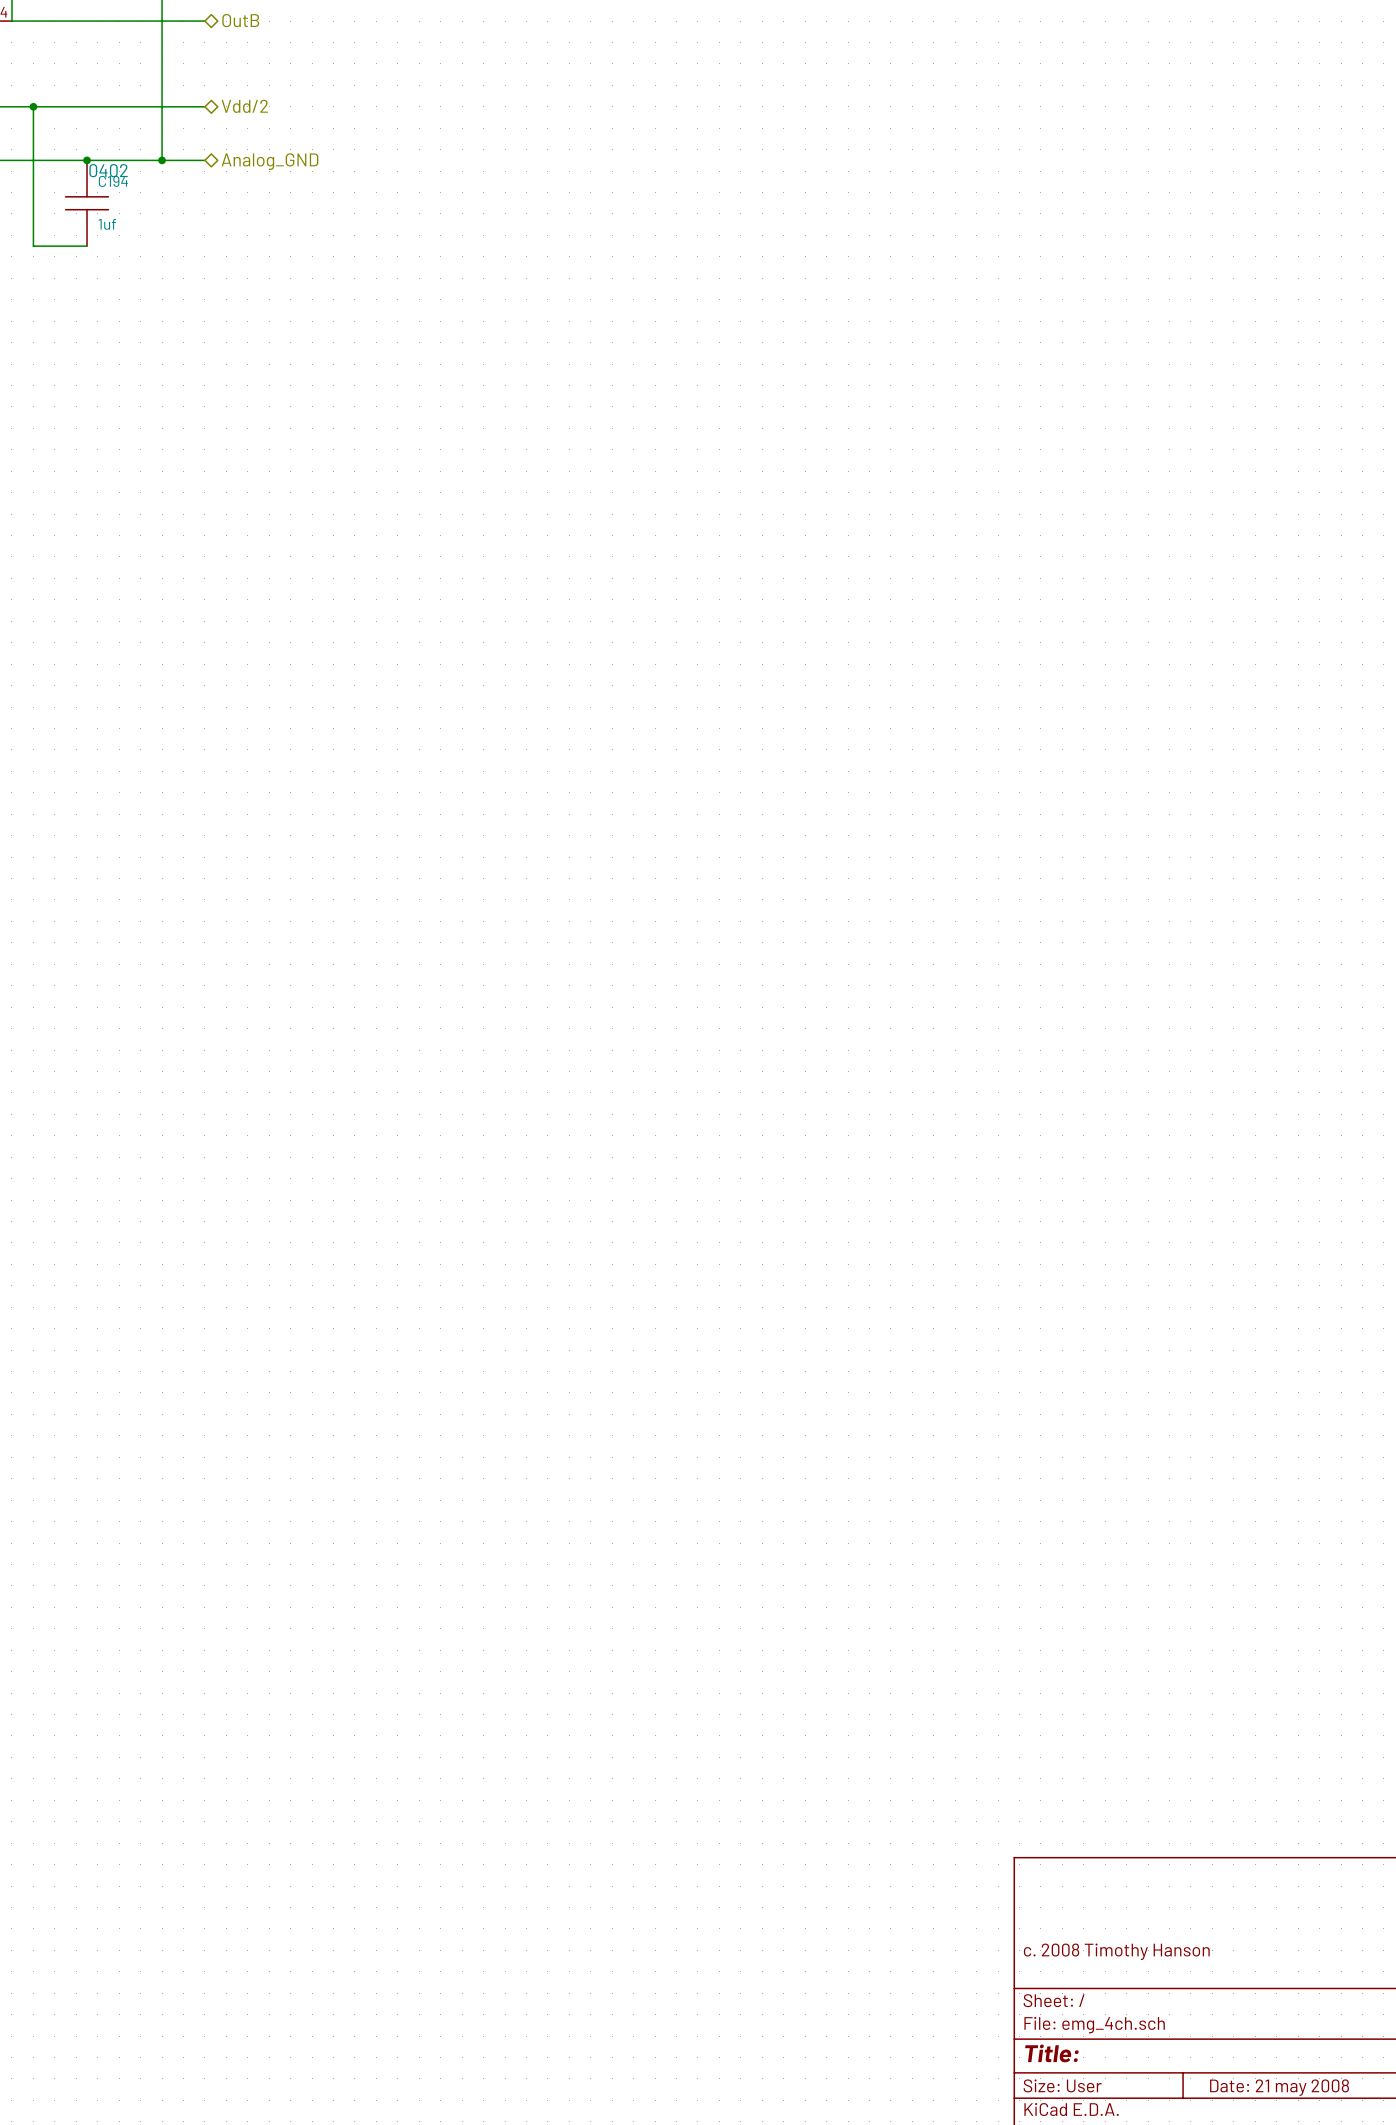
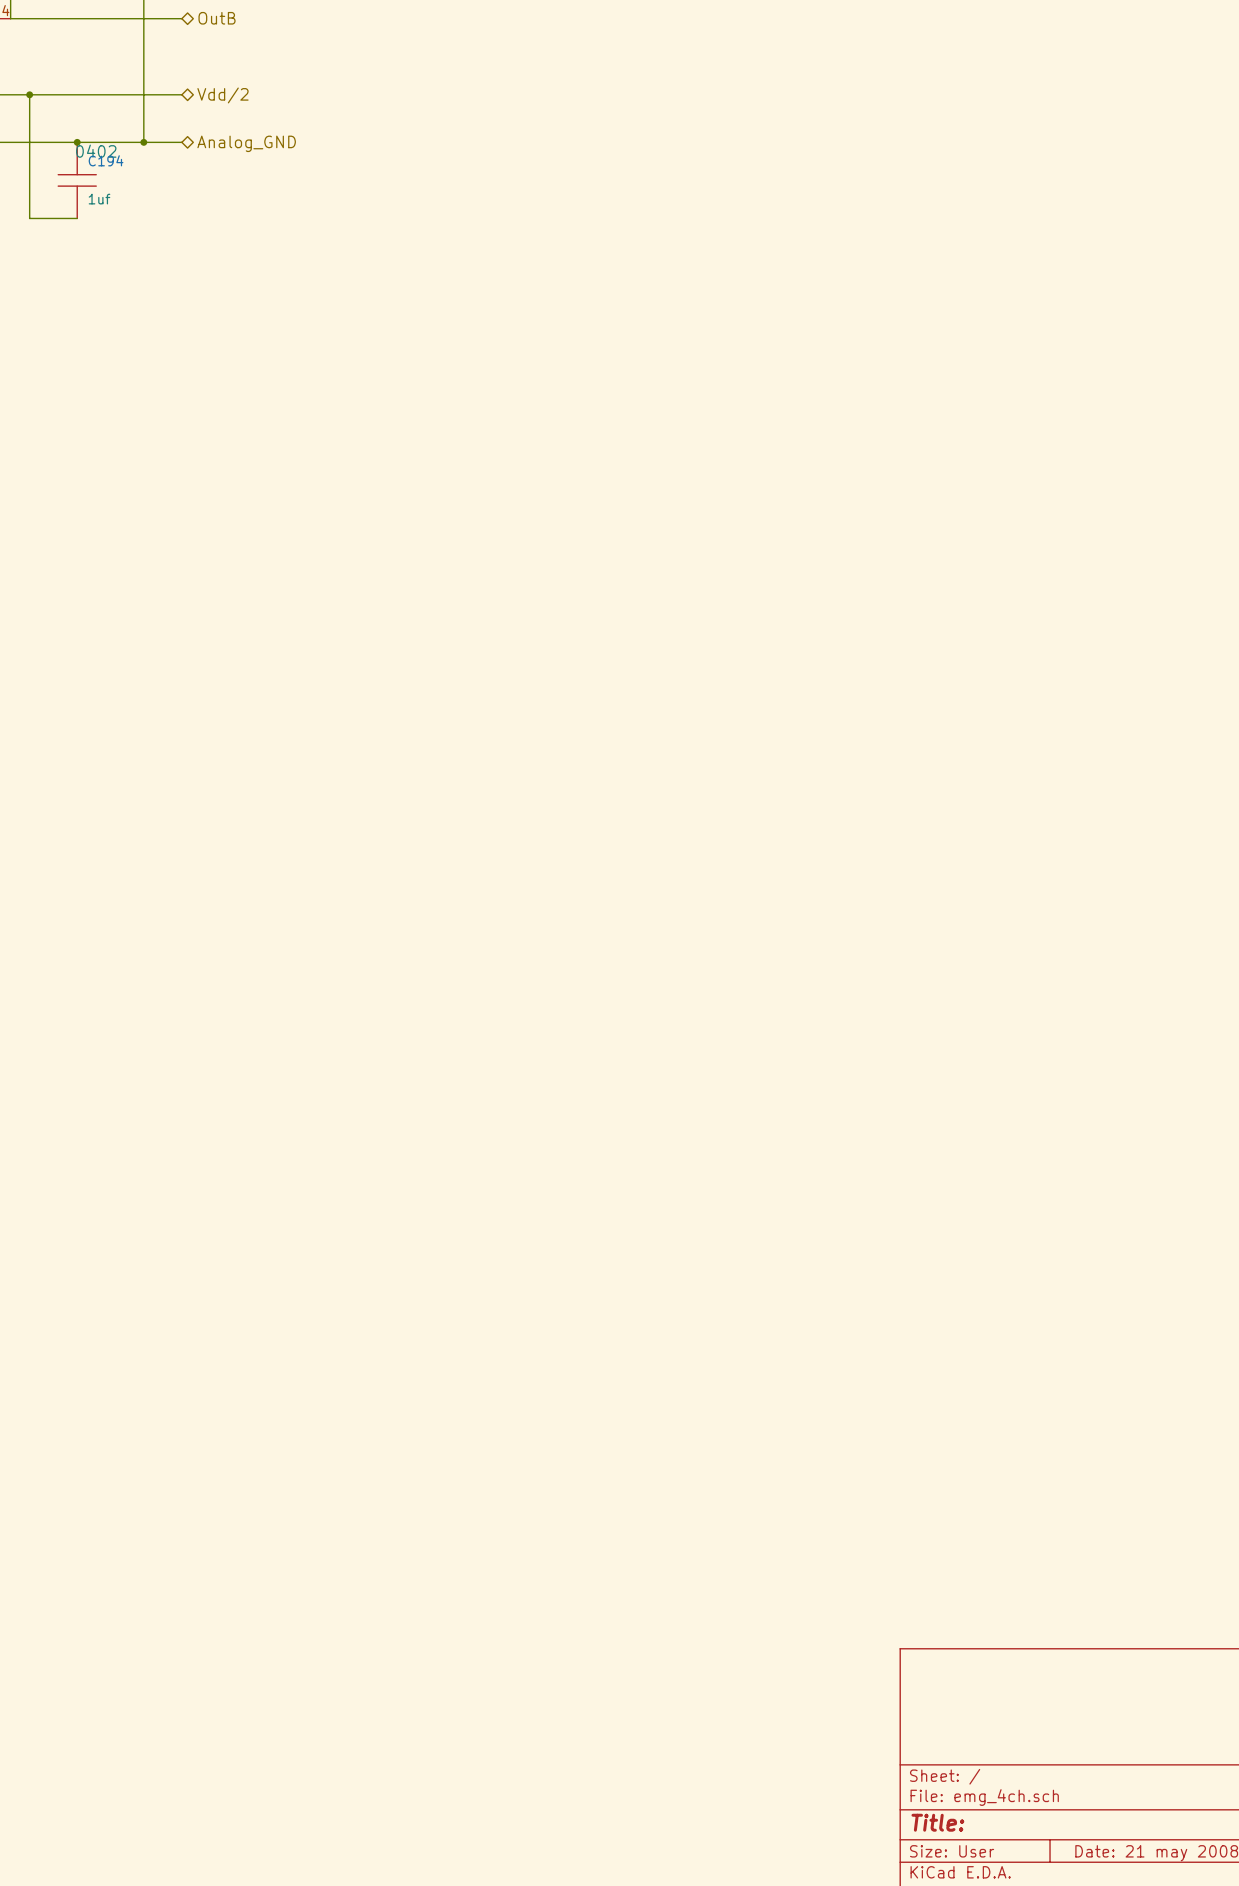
title block: c. 2008 Timothy Hanson (1116, 1951) -> none

